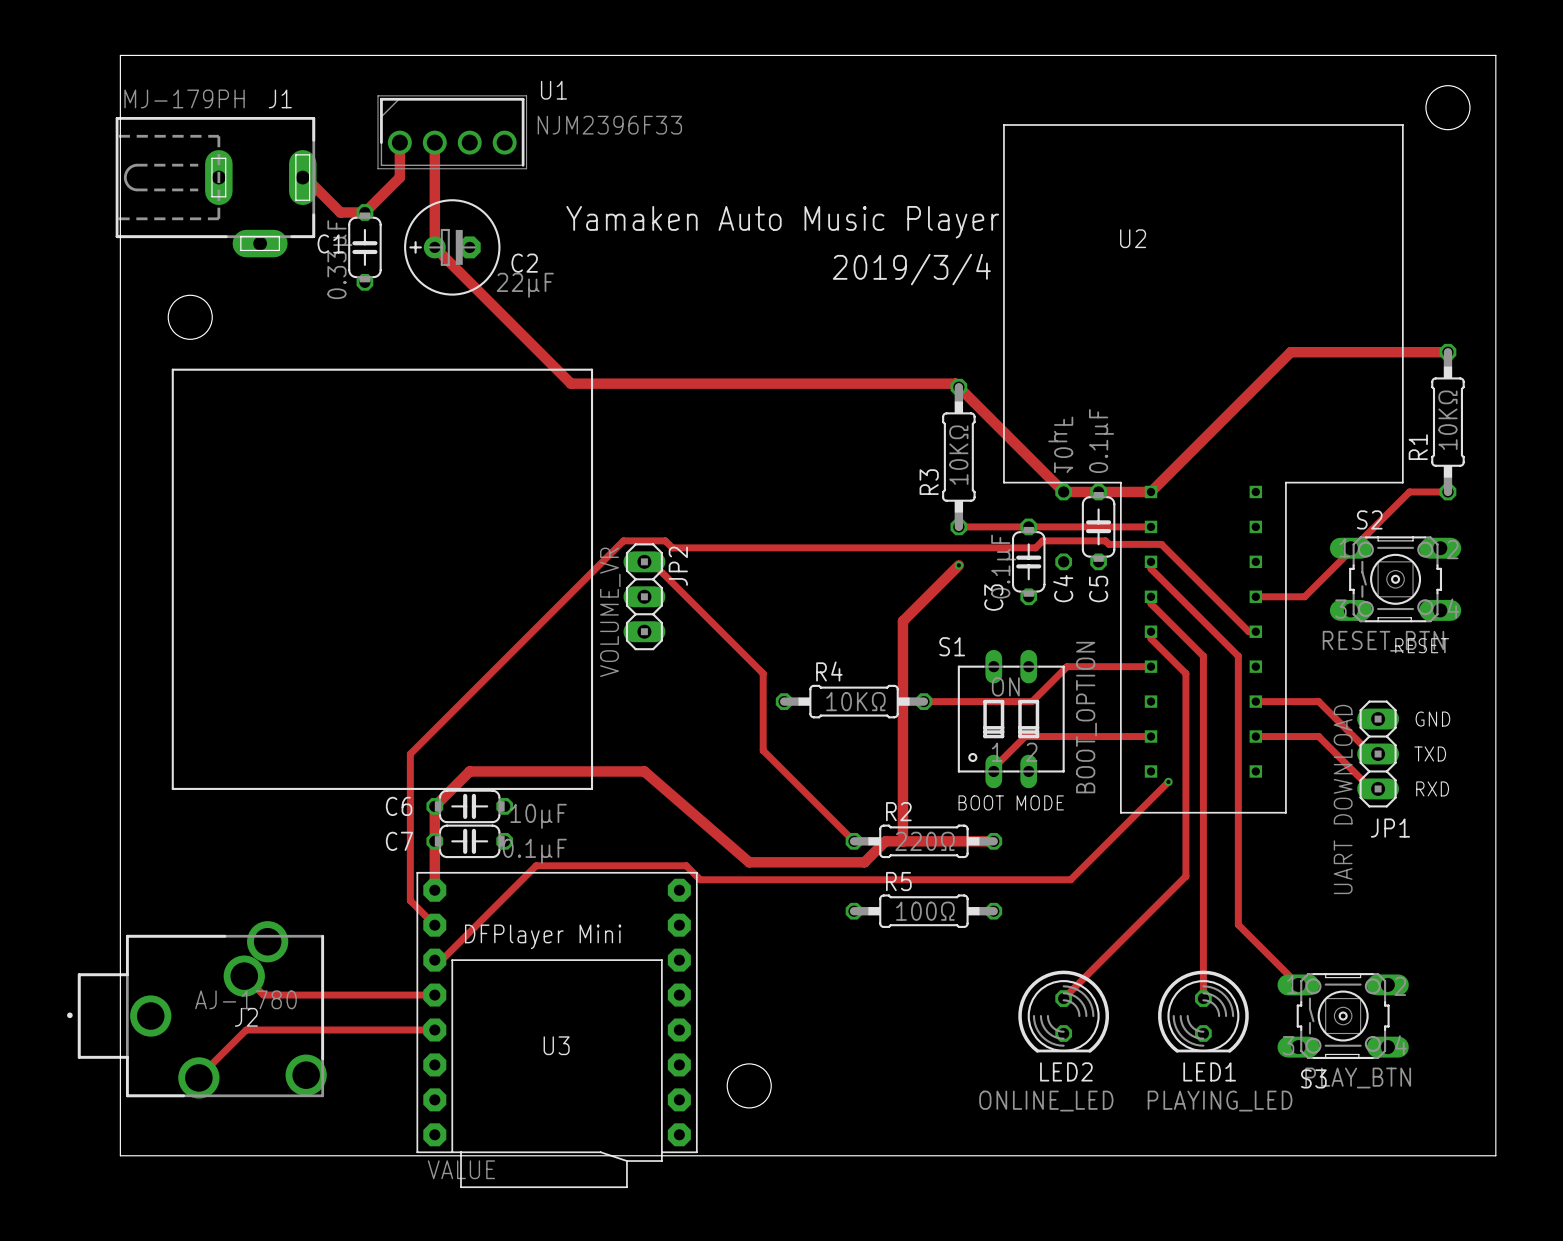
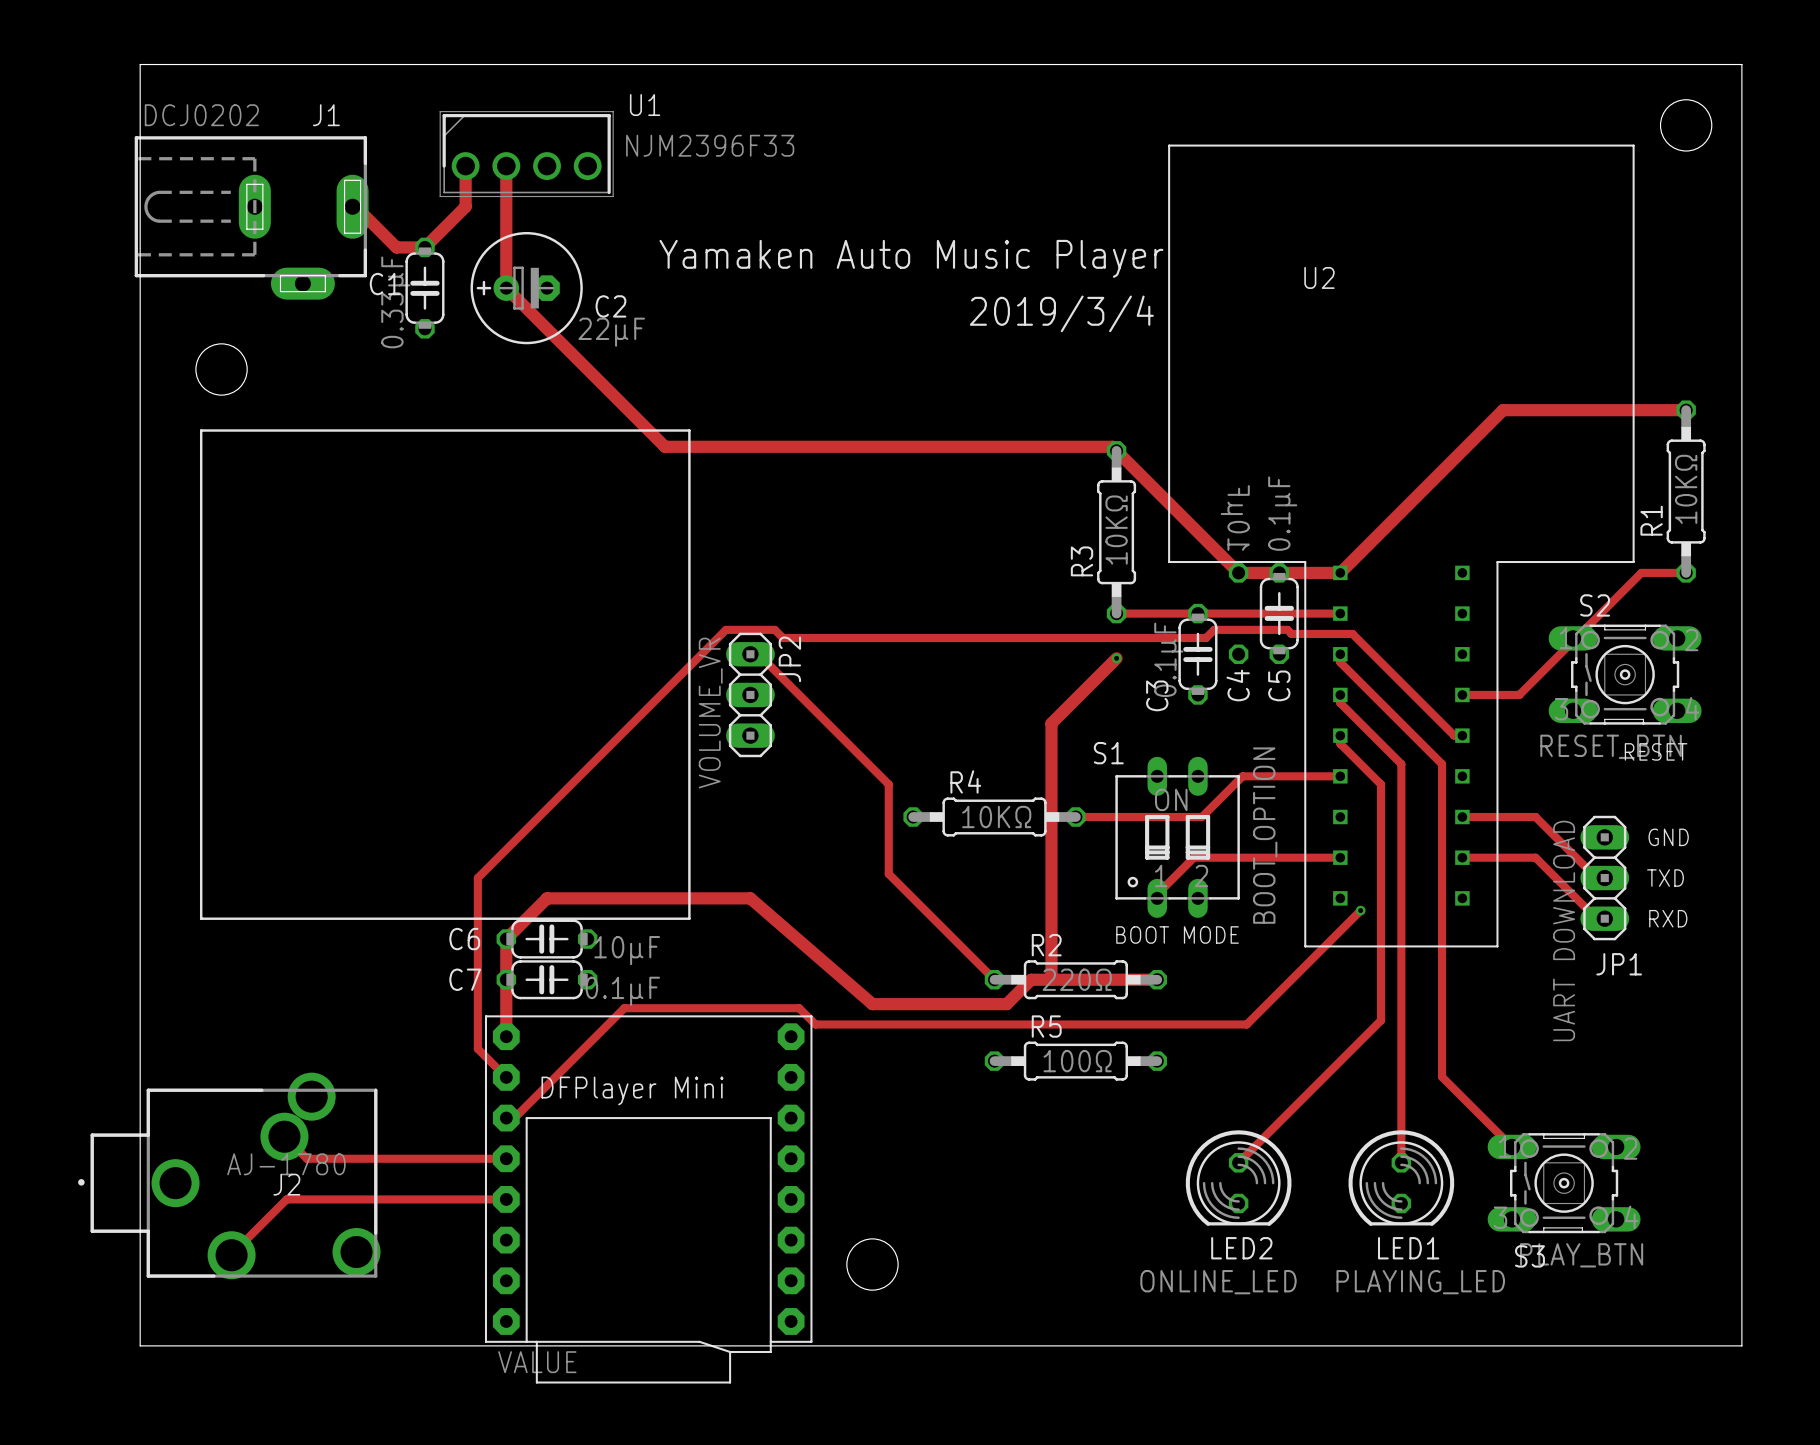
J1 value: MJ-179PH (184, 98) -> DCJ0202 (201, 115)
text: U3 (556, 1045) -> none

